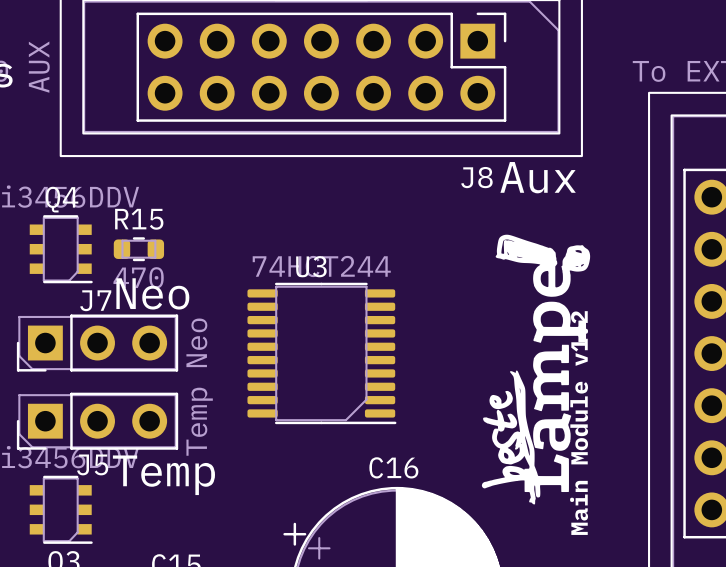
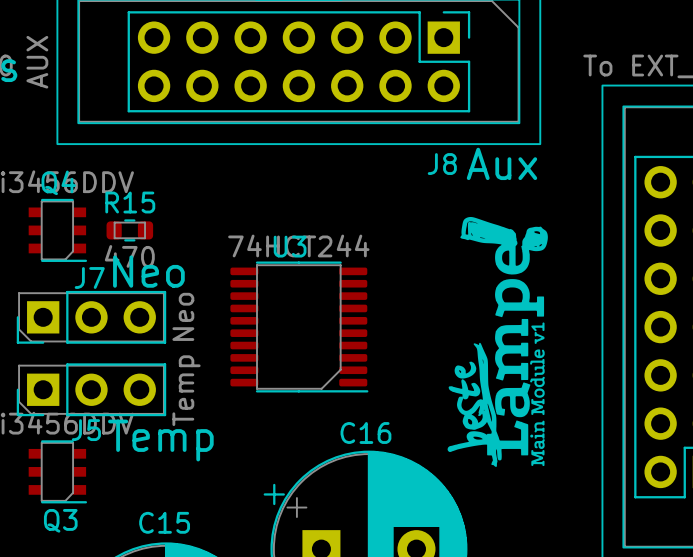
drawing shape: [481, 234, 591, 505] -> [447, 216, 548, 467]
text: Main Module v1.2 (579, 423) -> none

